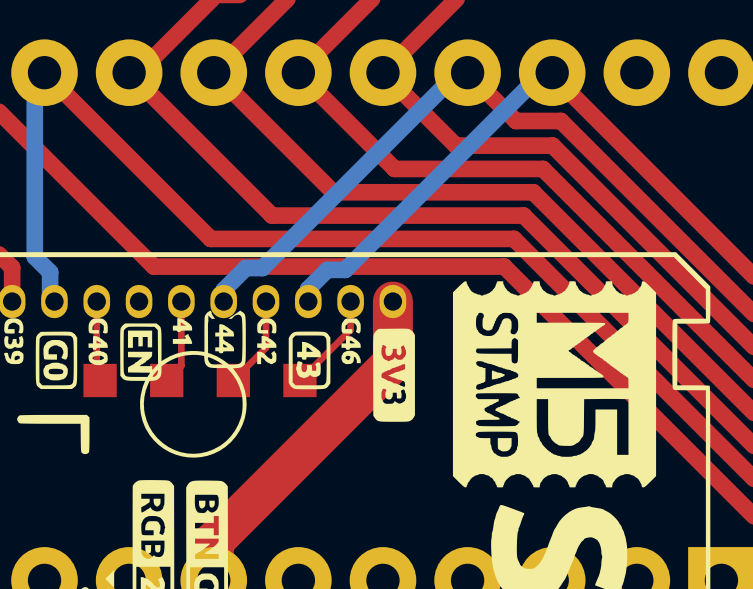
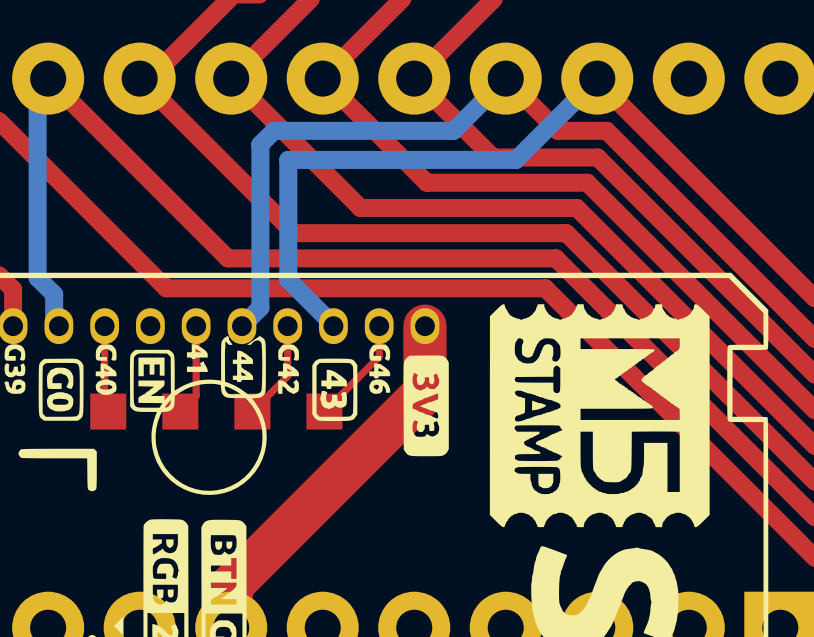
bottom track: (467, 72) (457, 72) (262, 268) (245, 268) (223, 290) (223, 301) -> (505, 78) (453, 130) (274, 130) (260, 144) (260, 307) (241, 326)
bottom track: (552, 72) (542, 72) (345, 269) (327, 269) (308, 288) (308, 300) -> (597, 78) (515, 159) (288, 159) (288, 279) (333, 324)

